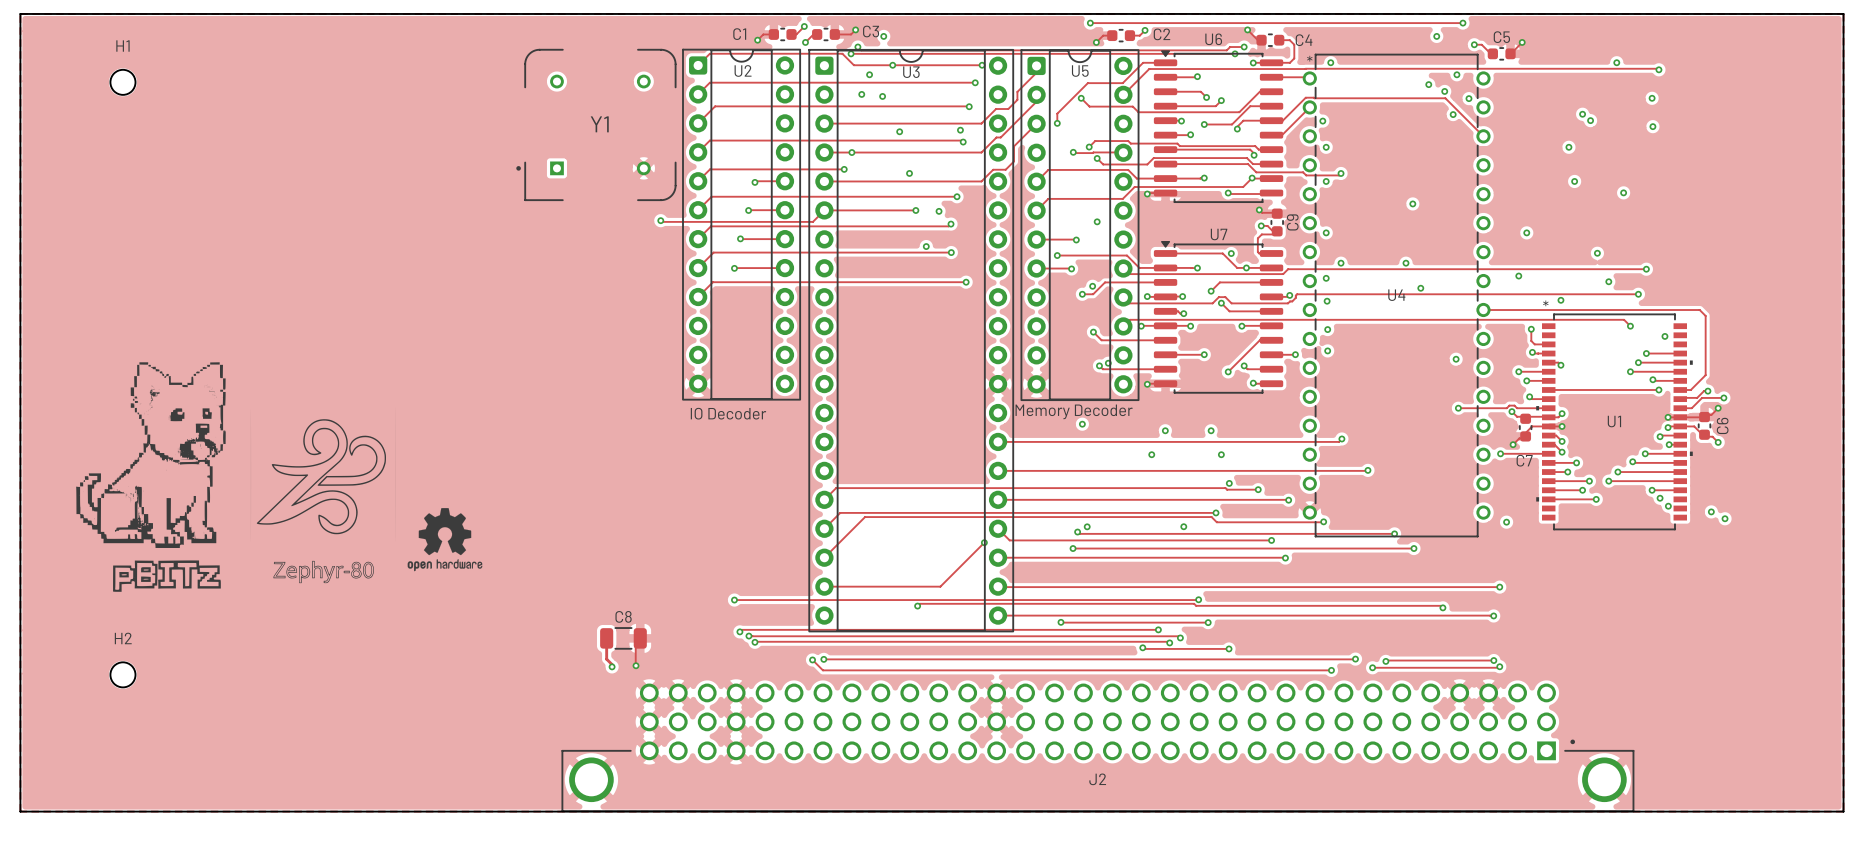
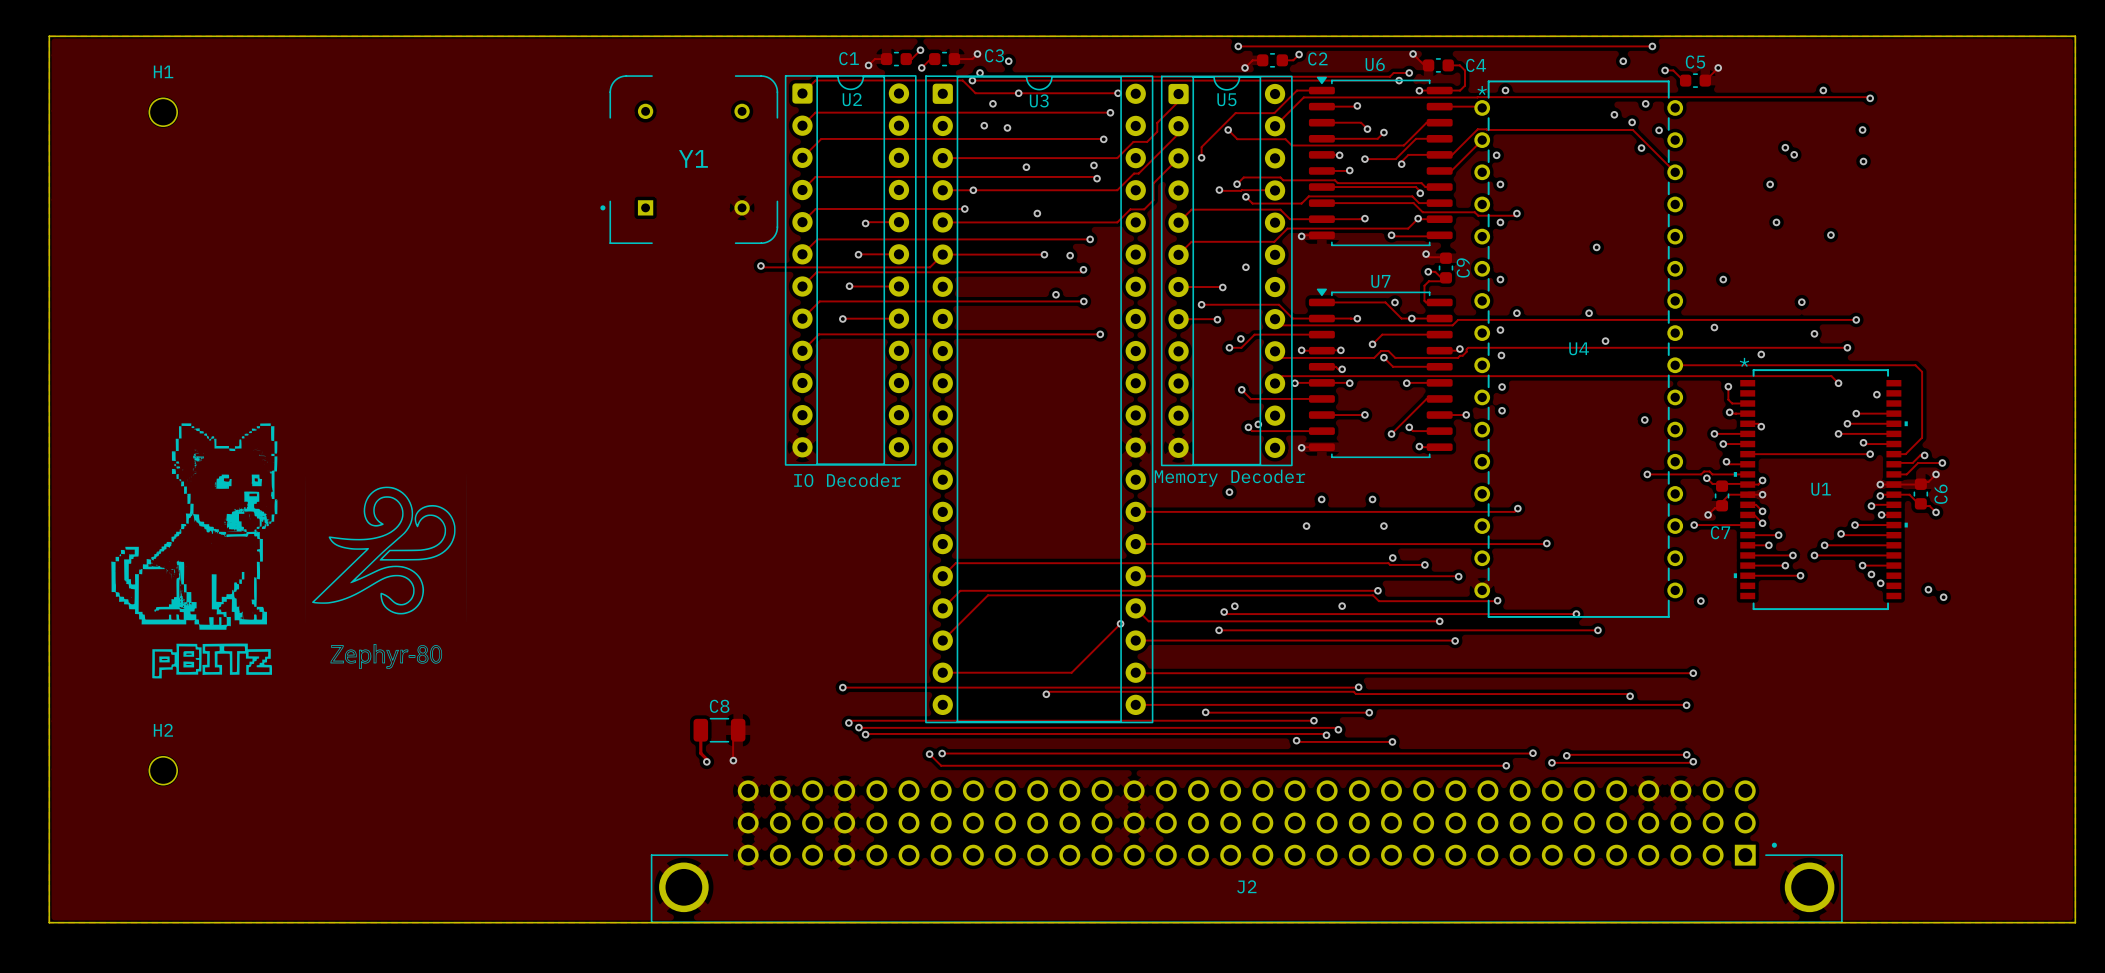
drawing: [407, 508, 483, 572] -> none

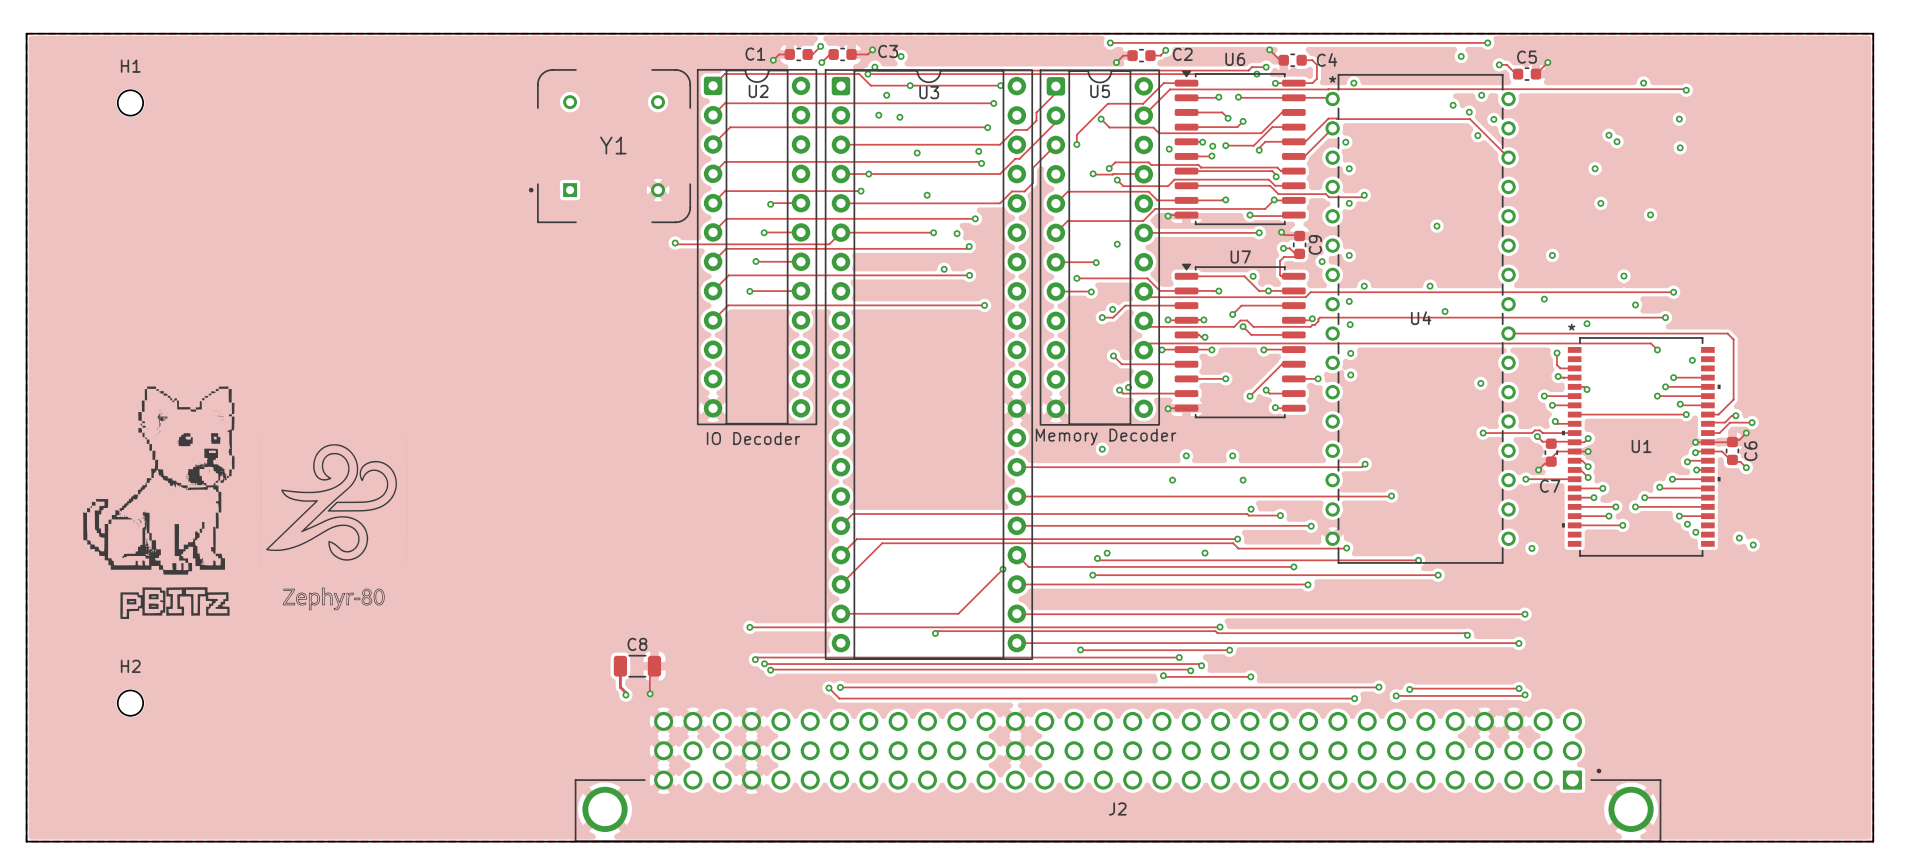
track: none -> (1238, 97) (1293, 97)
via: none -> (1238, 97)
via: none -> (1212, 146)
via: none -> (1169, 149)
track: none -> (1143, 232) (1259, 232)
via: none -> (1259, 232)
via: none -> (1322, 261)

